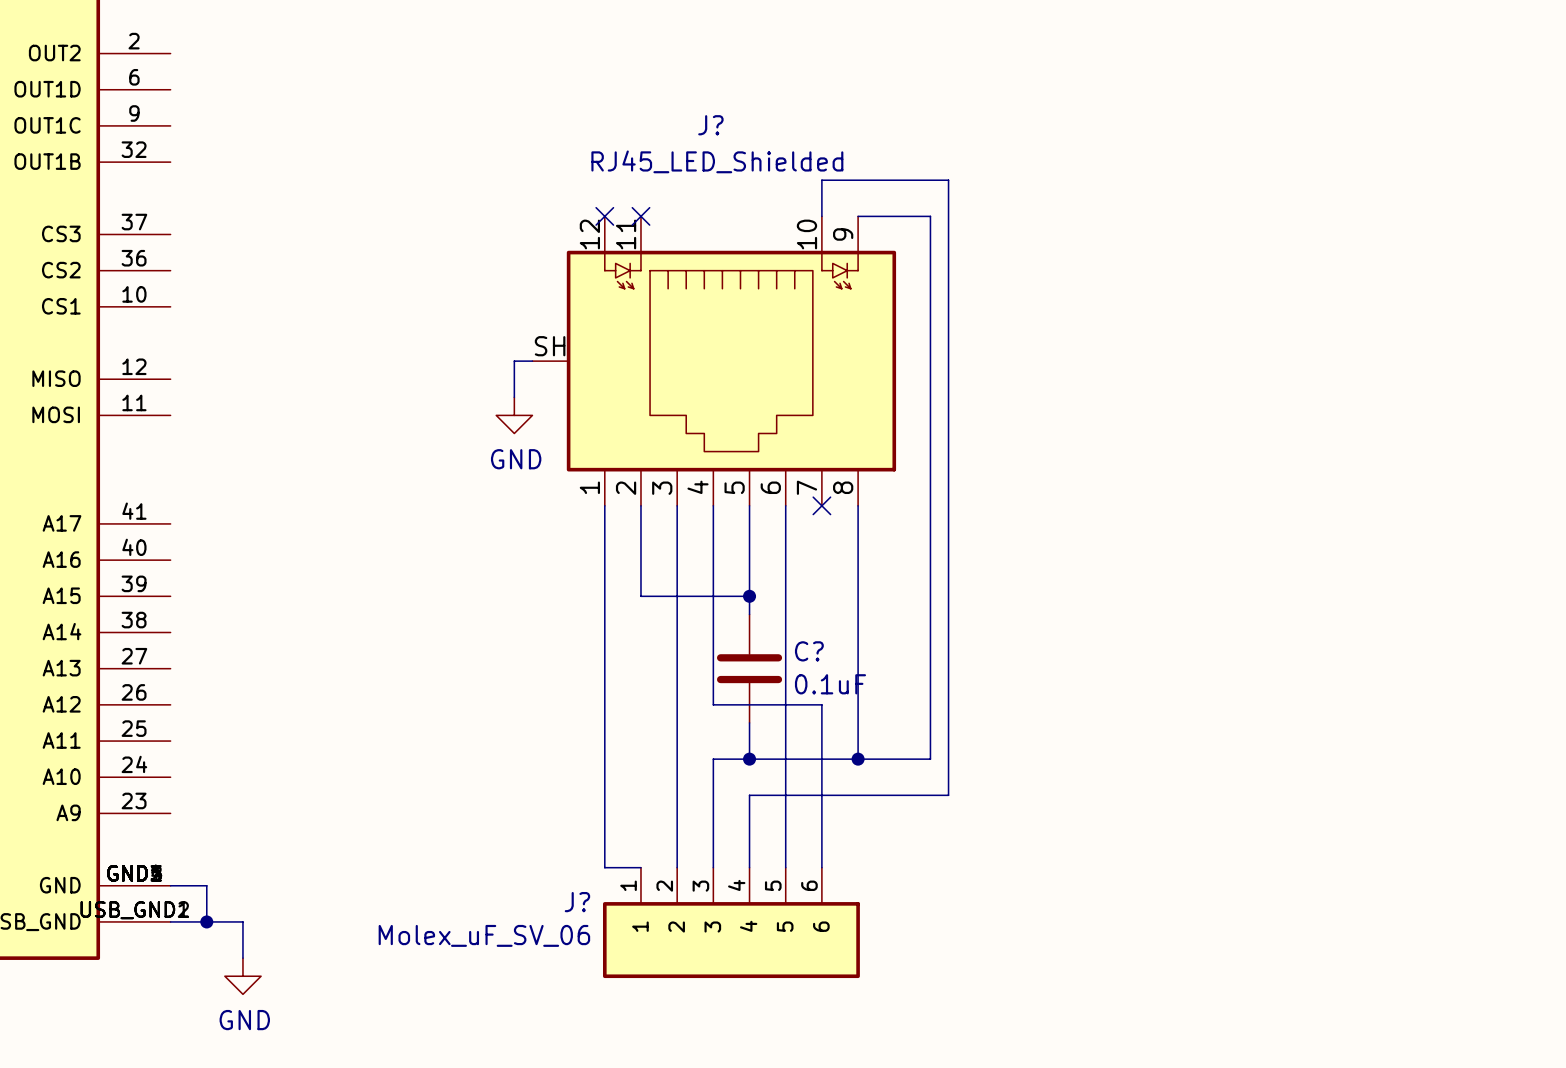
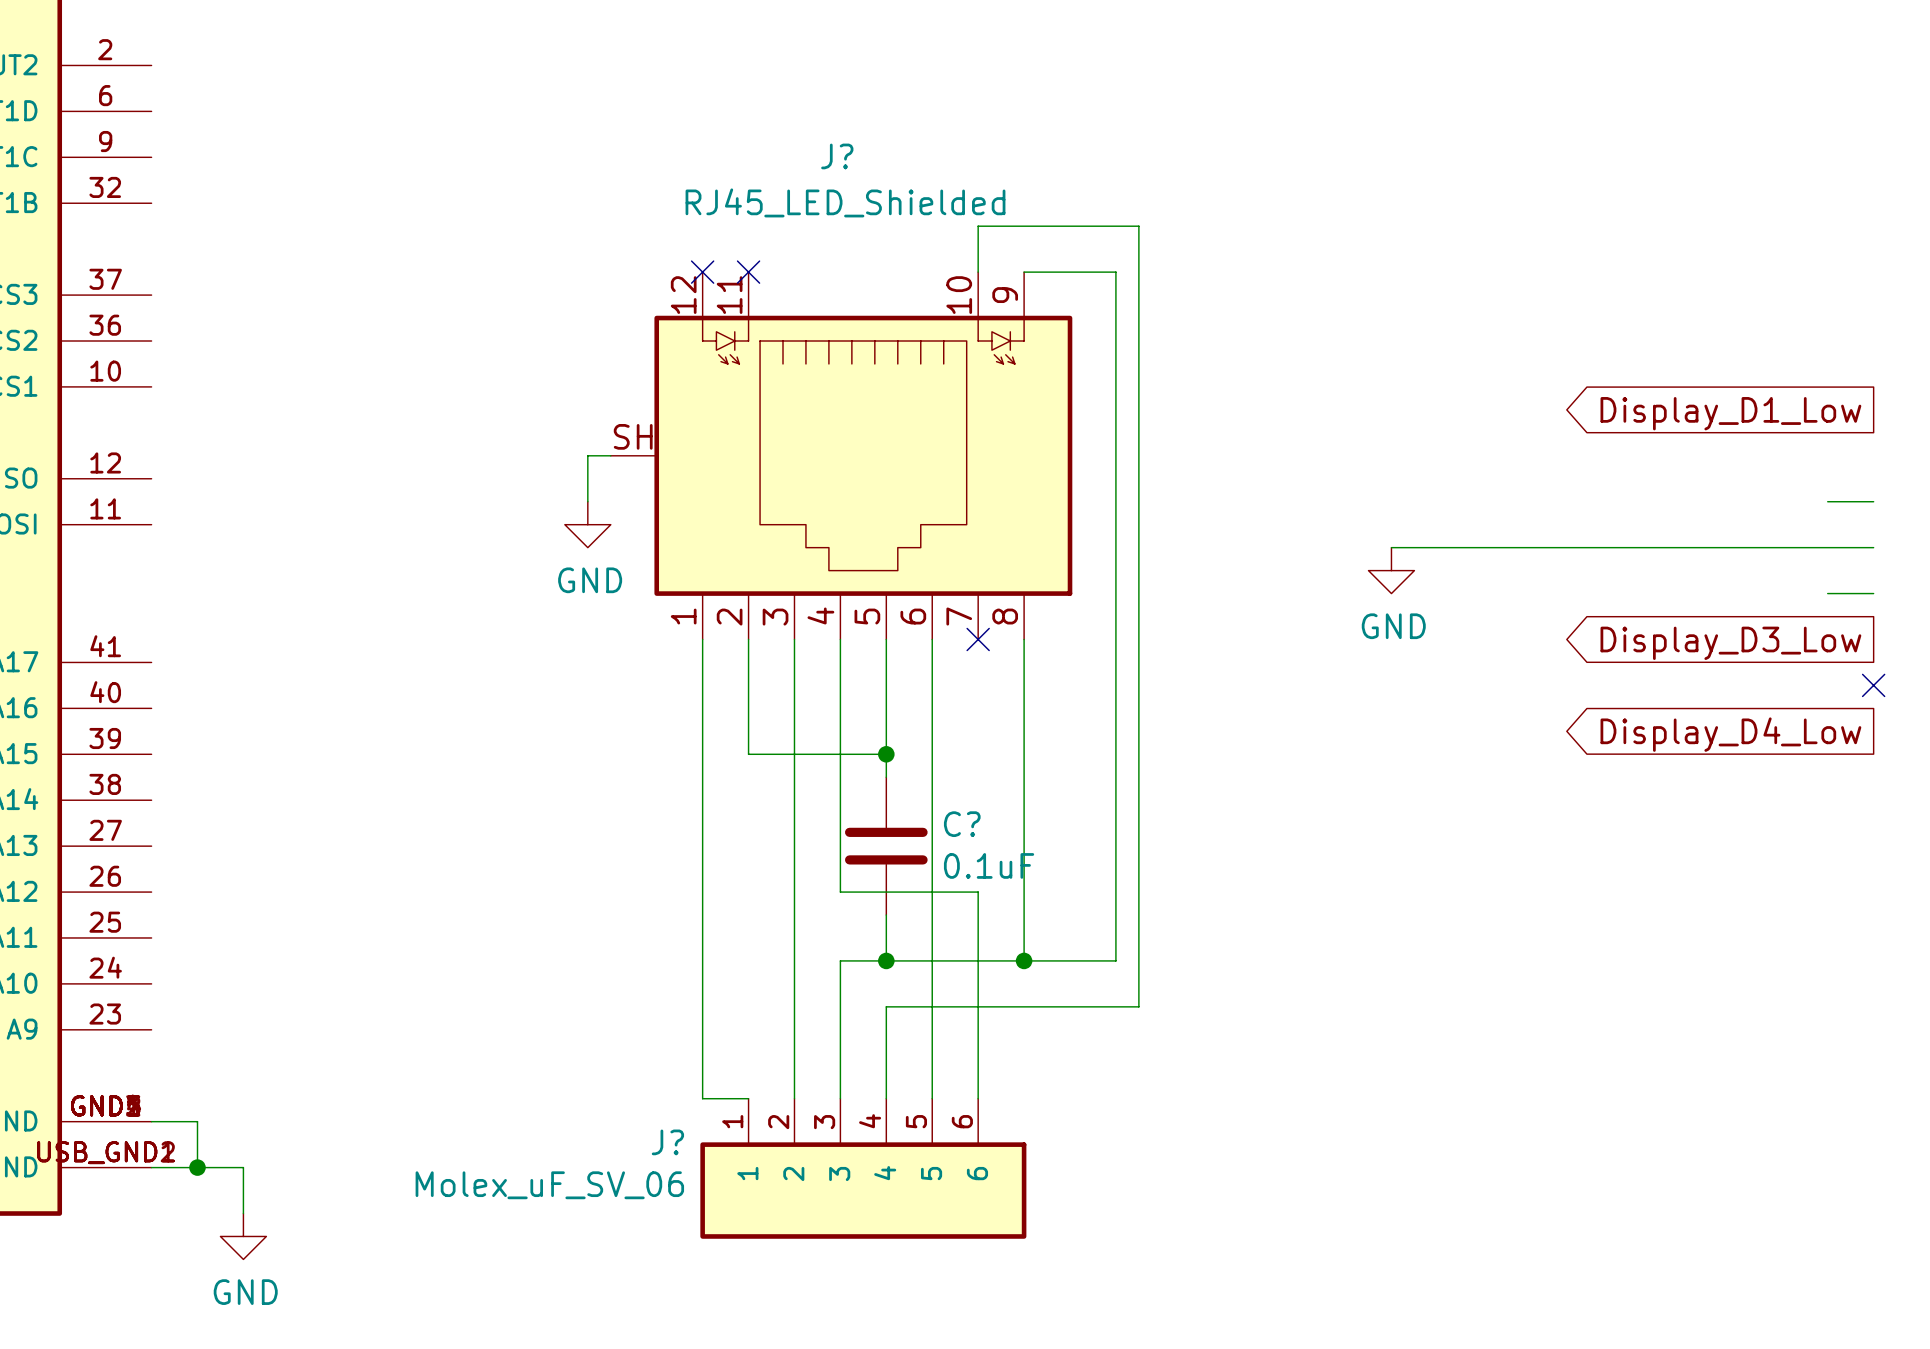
global label: none -> Display_D1_Low (1730, 413)
wire: none -> (1827, 501) (1873, 501)
wire: none -> (1391, 547) (1873, 547)
power symbol: none -> GND (1391, 570)
wire: none -> (1827, 593) (1873, 593)
global label: none -> Display_D3_Low (1730, 643)
no-connect mark: none -> (1873, 685)
global label: none -> Display_D4_Low (1730, 734)

